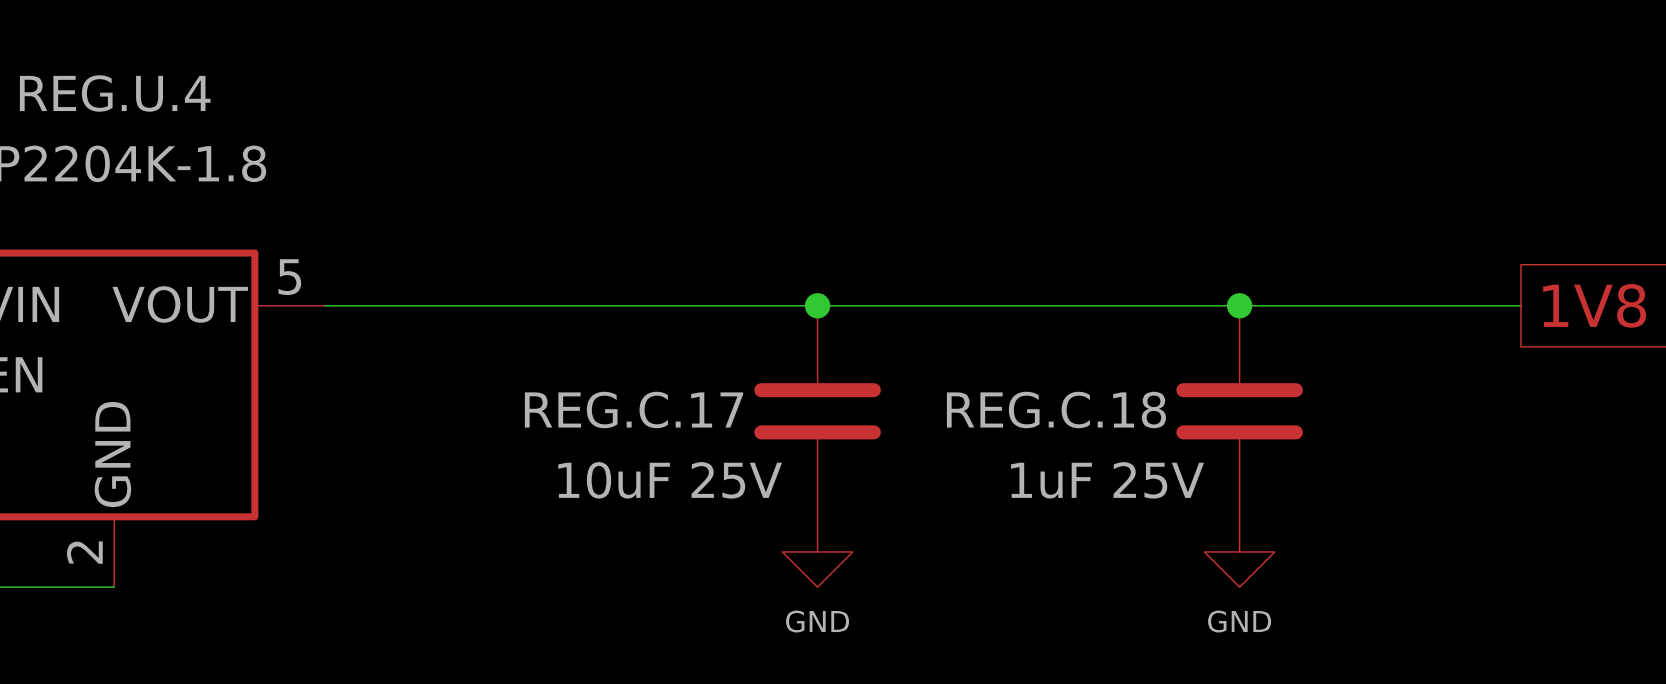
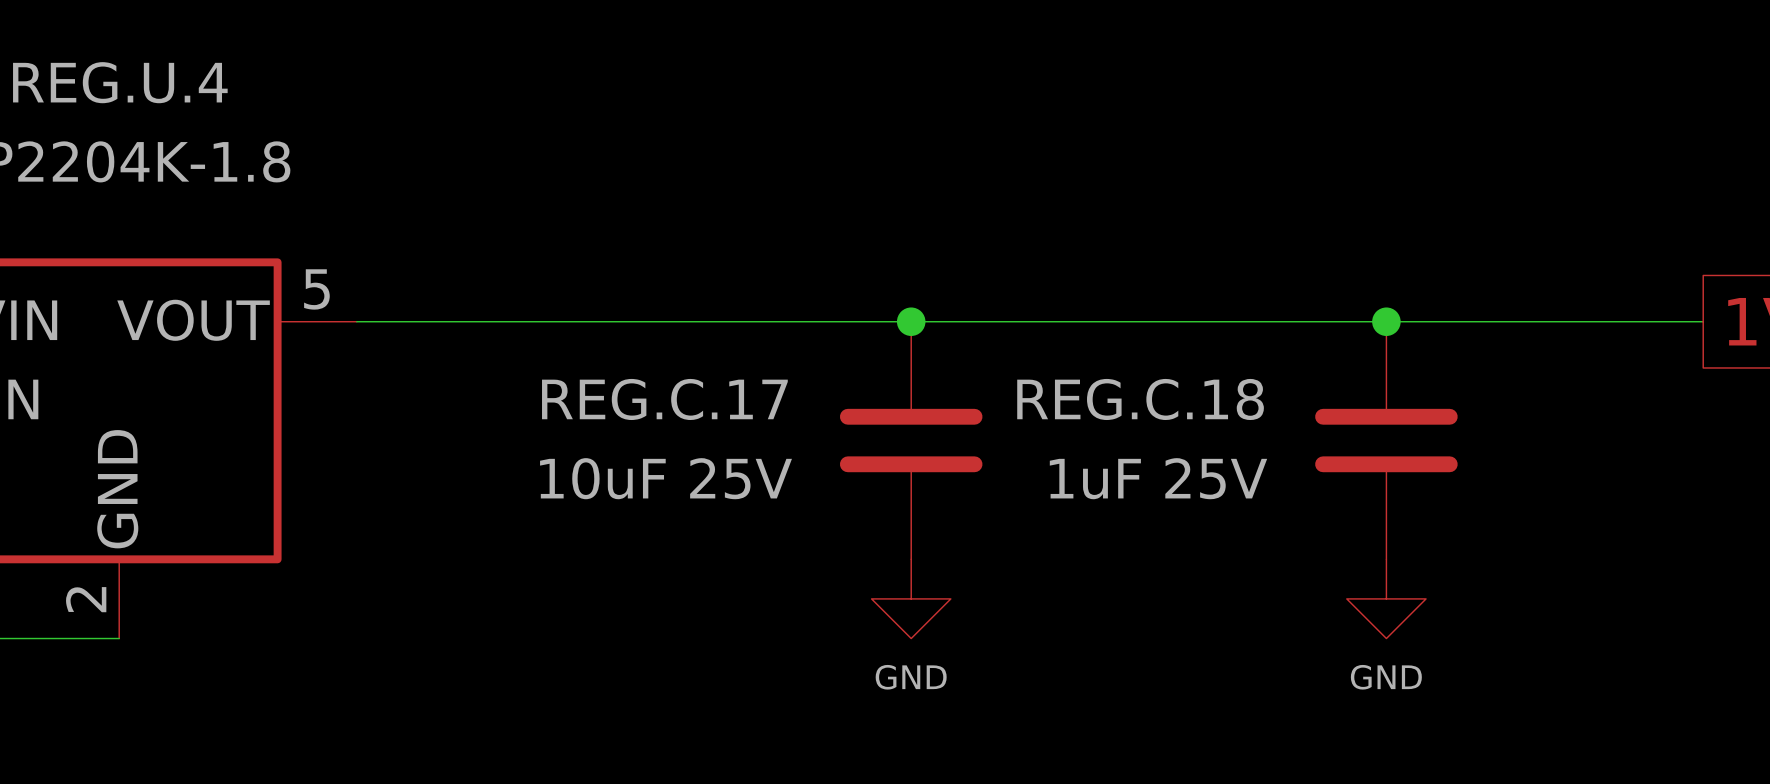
REG.C.17 name position: REG.C.17 (633, 410) -> REG.C.17 (664, 399)
REG.C.18 name position: REG.C.18 (1056, 410) -> REG.C.18 (1140, 399)
REG.C.17 value position: 10uF 25V (670, 480) -> 10uF 25V (666, 478)
REG.C.18 value position: 1uF 25V (1107, 480) -> 1uF 25V (1158, 478)

